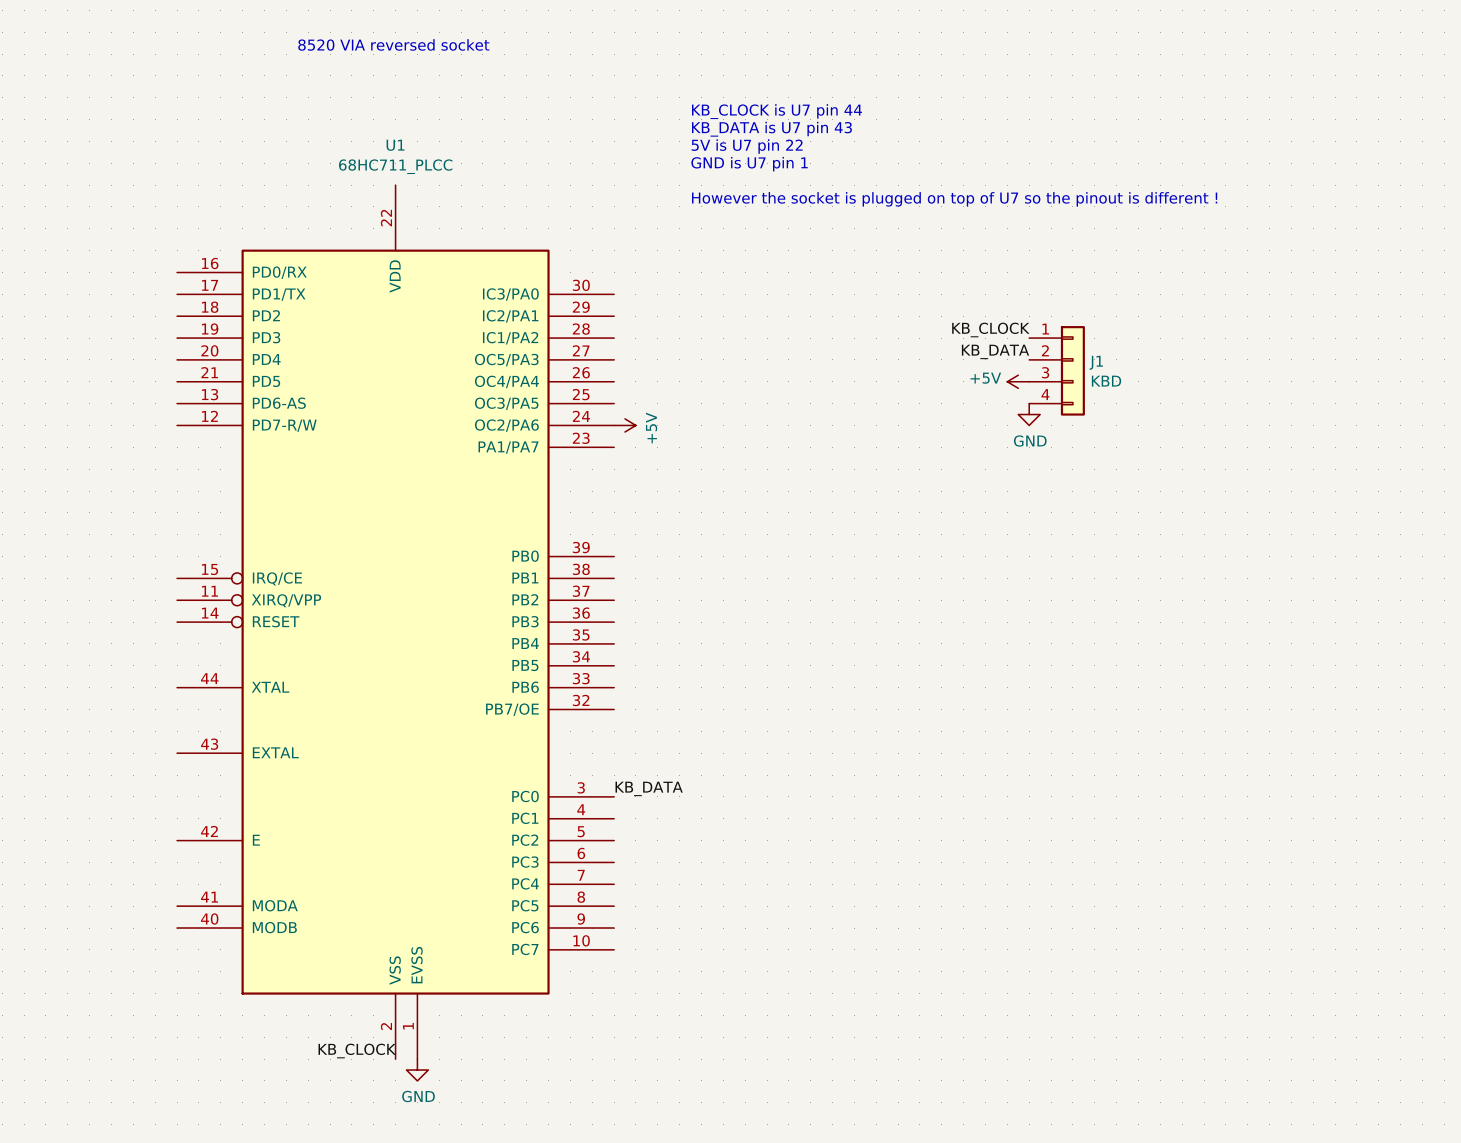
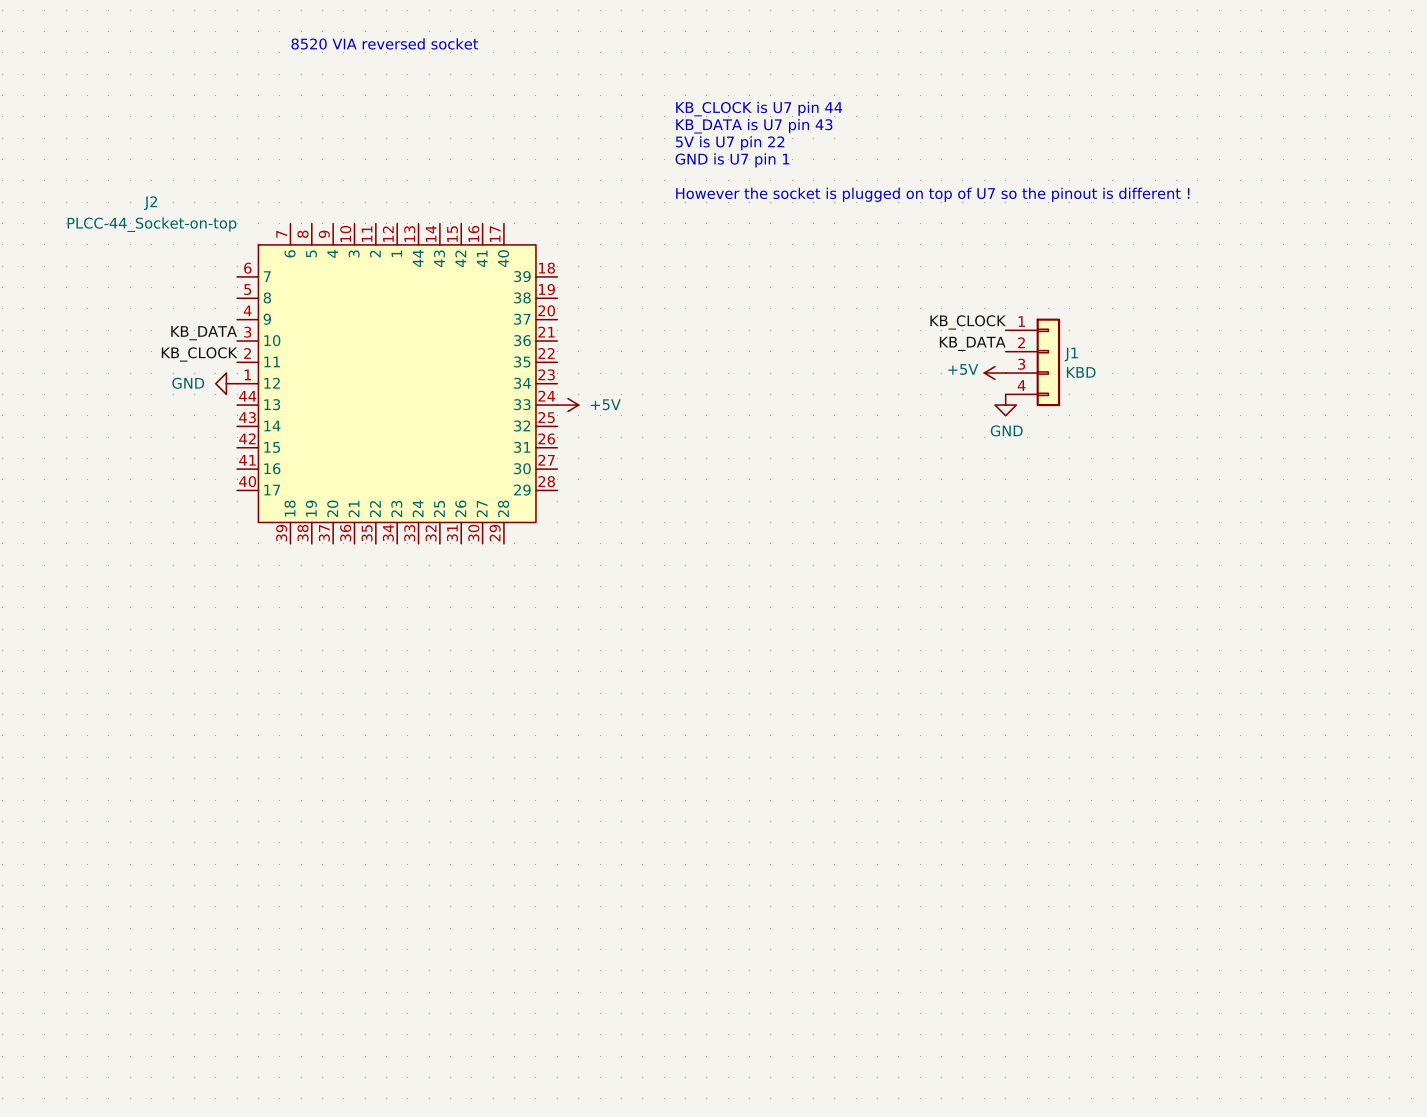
label: none -> KB_DATA (204, 333)
label: none -> KB_CLOCK (199, 354)
power symbol: none -> GND (226, 383)
J2: none -> PLCC-44_Socket-on-top (397, 383)
power symbol position: +5V (624, 425) -> +5V (567, 405)
power symbol text rotation: 0° (651, 428) -> 90° clockwise (605, 404)
U1: 68HC711_PLCC (395, 622) -> none
label: KB_DATA (649, 788) -> none
label: KB_CLOCK (357, 1051) -> none
power symbol: GND (417, 1070) -> none

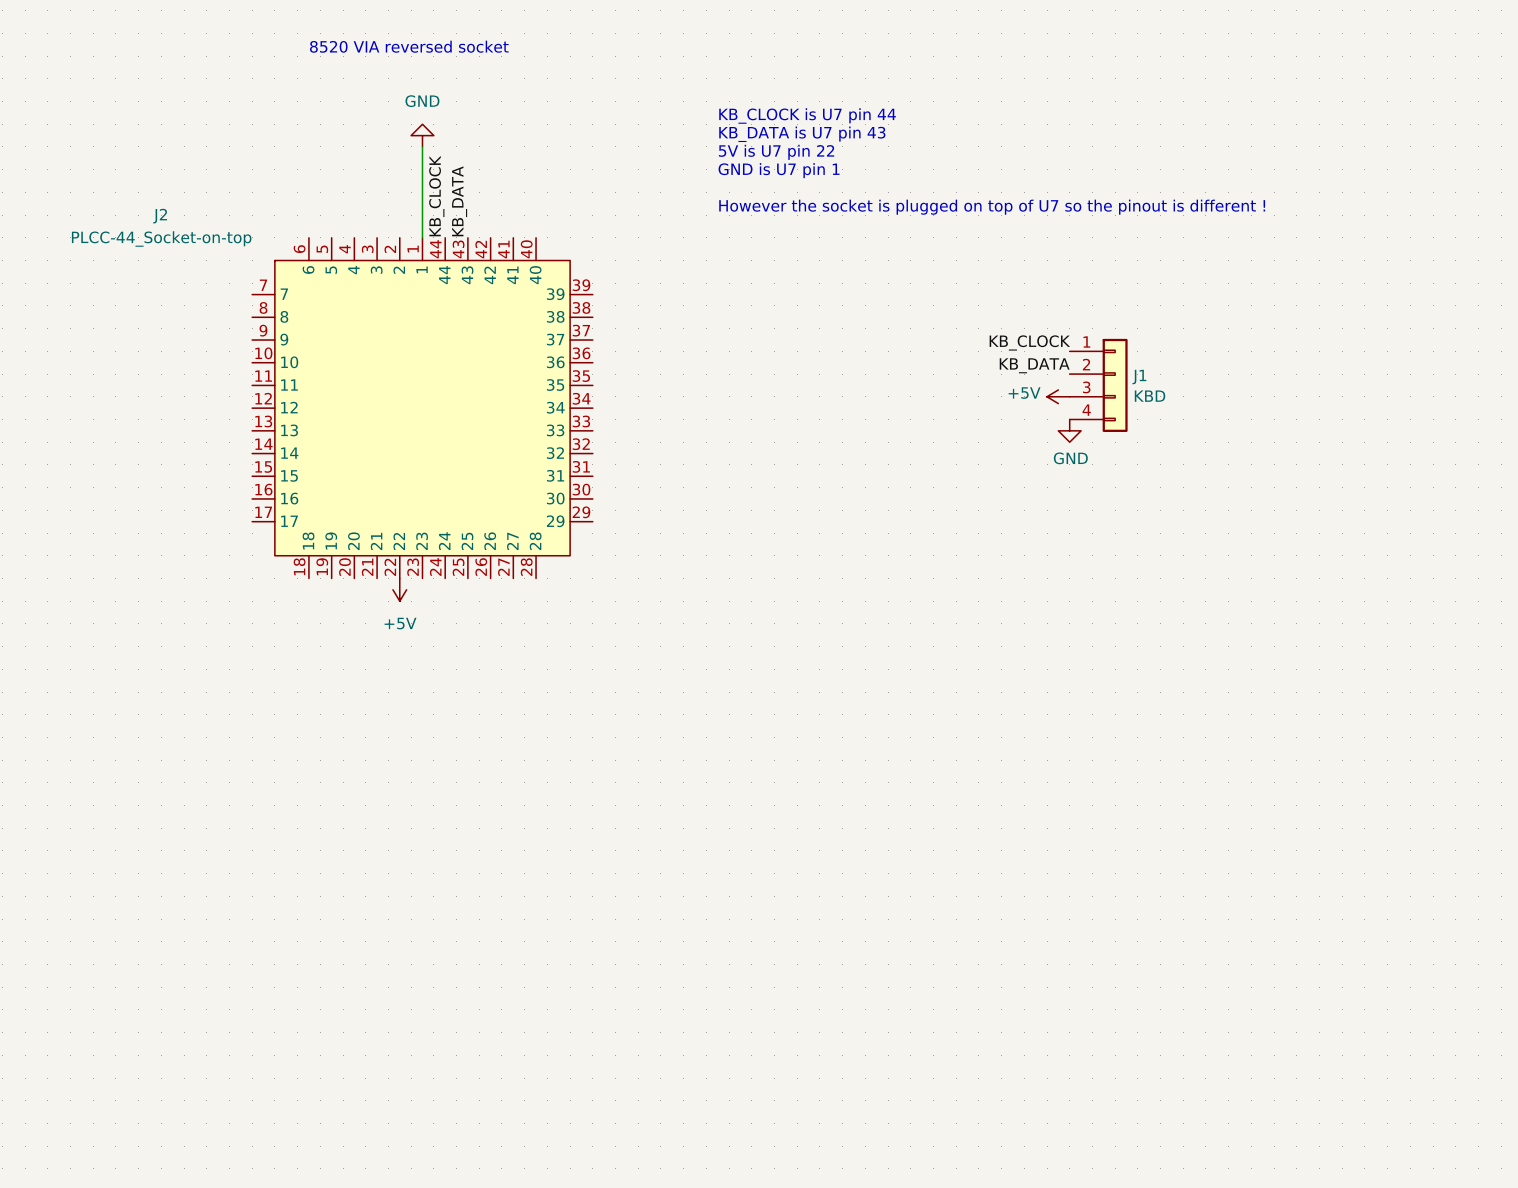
power symbol: none -> GND (422, 135)
wire: none -> (422, 146) (422, 237)
label: none -> KB_CLOCK (436, 196)
label: none -> KB_DATA (459, 201)
J2 symbol: [237, 223, 558, 544] -> [252, 237, 593, 579]
label: KB_DATA (204, 333) -> none
label: KB_CLOCK (199, 354) -> none
power symbol: GND (226, 383) -> none
power symbol: +5V (567, 405) -> none
power symbol: none -> +5V (399, 589)

